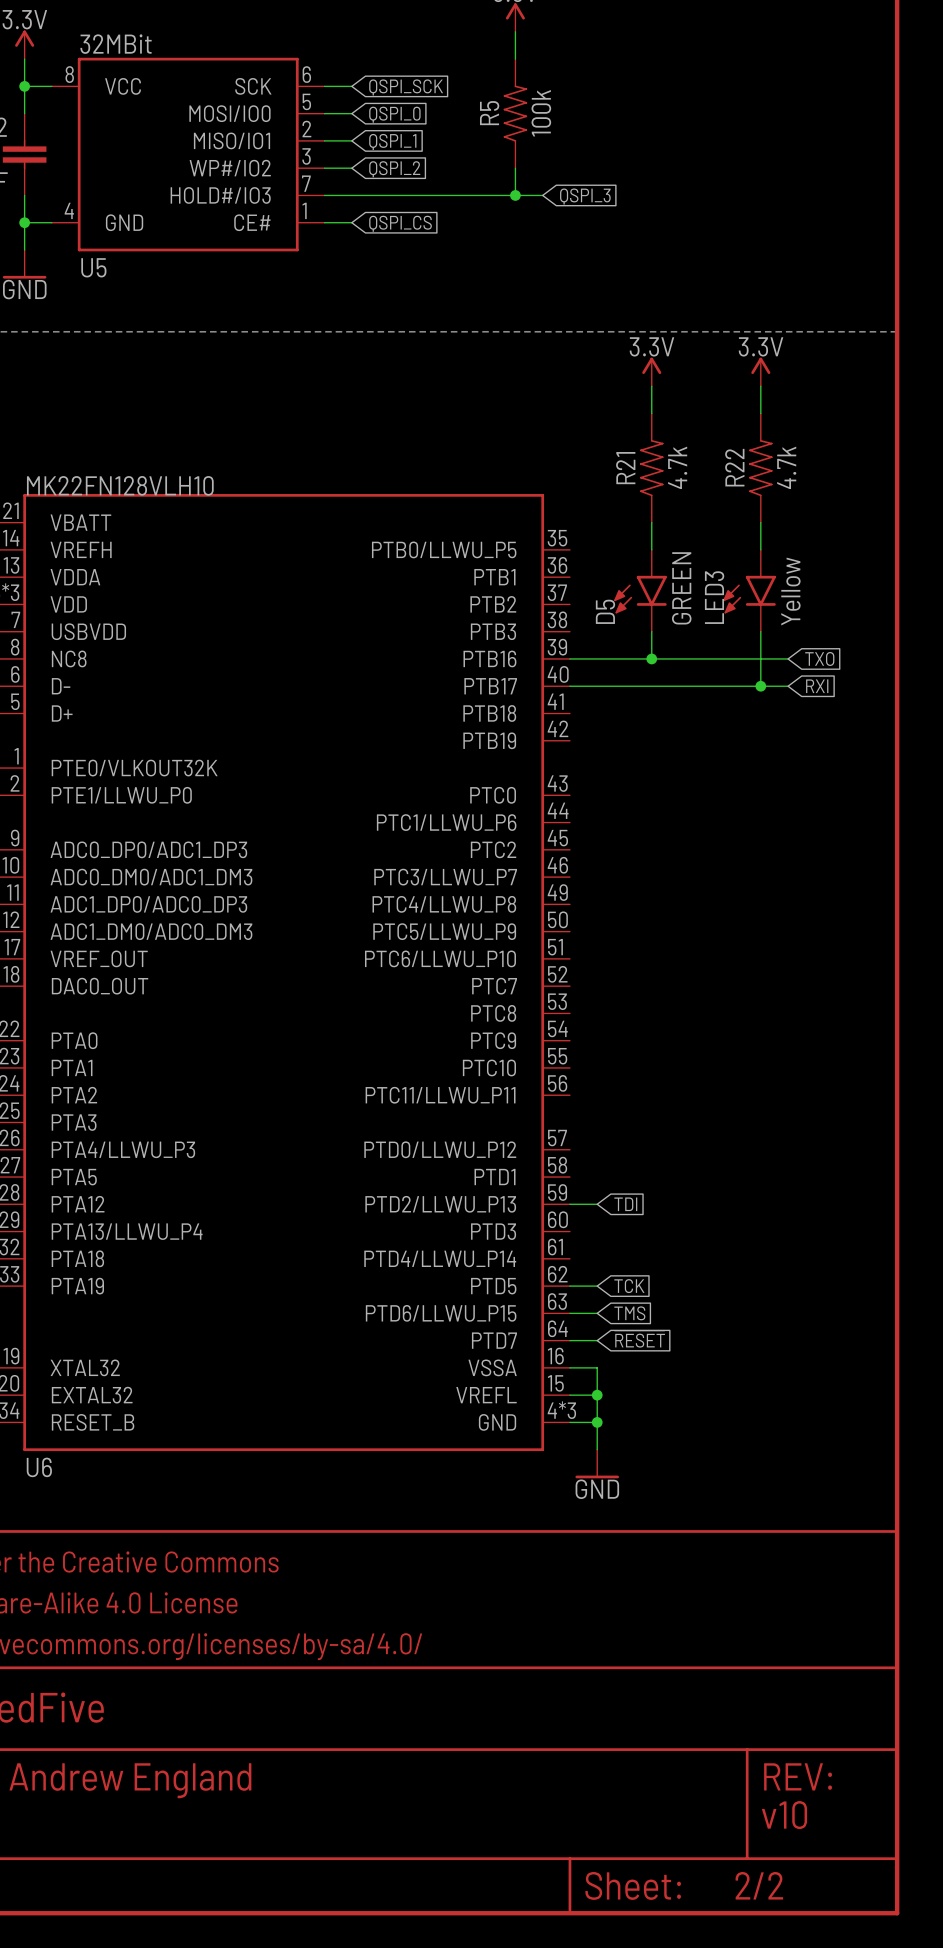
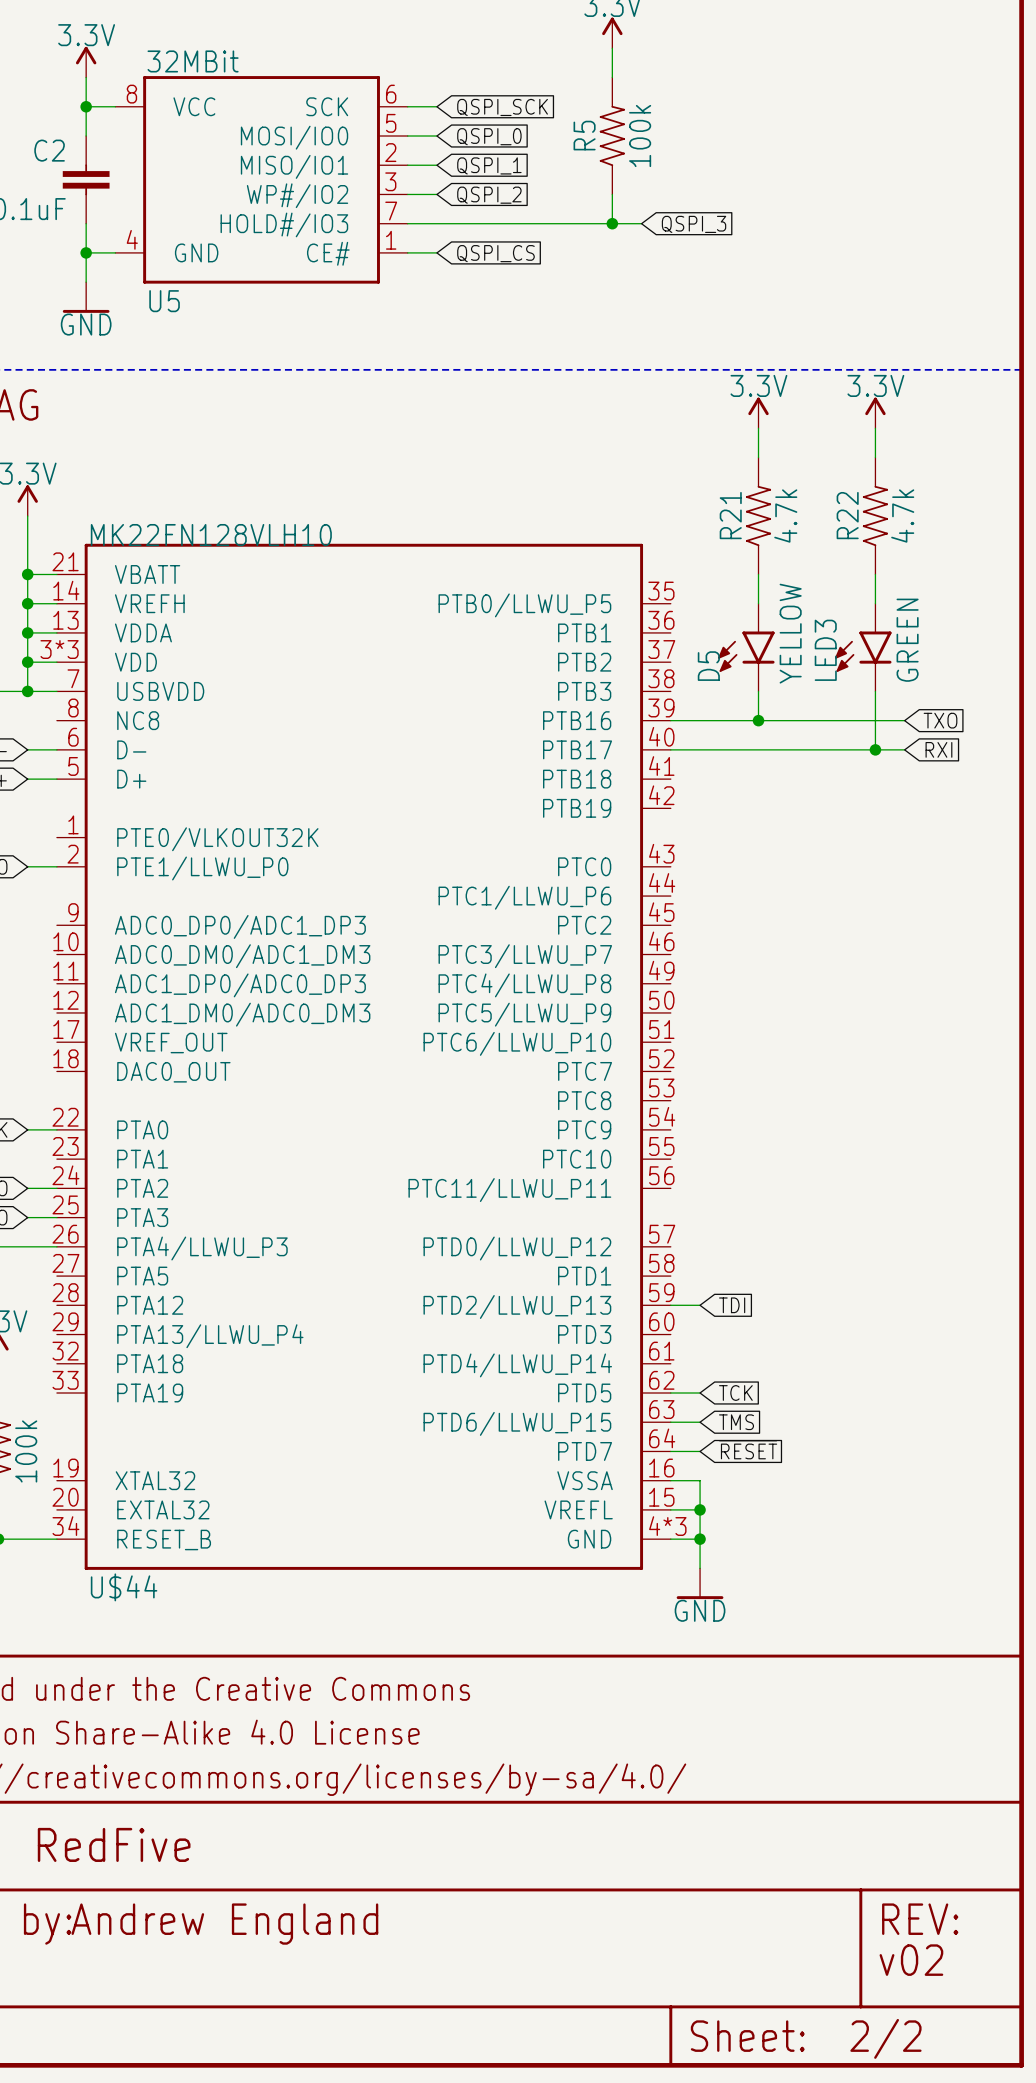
D5 value: GREEN (681, 588) -> YELLOW (790, 633)
LED3 value: Yellow (790, 591) -> GREEN (907, 640)
U6 name: U6 (39, 1467) -> U$44 (124, 1587)
text: v10 (784, 1815) -> v02 (911, 1960)

